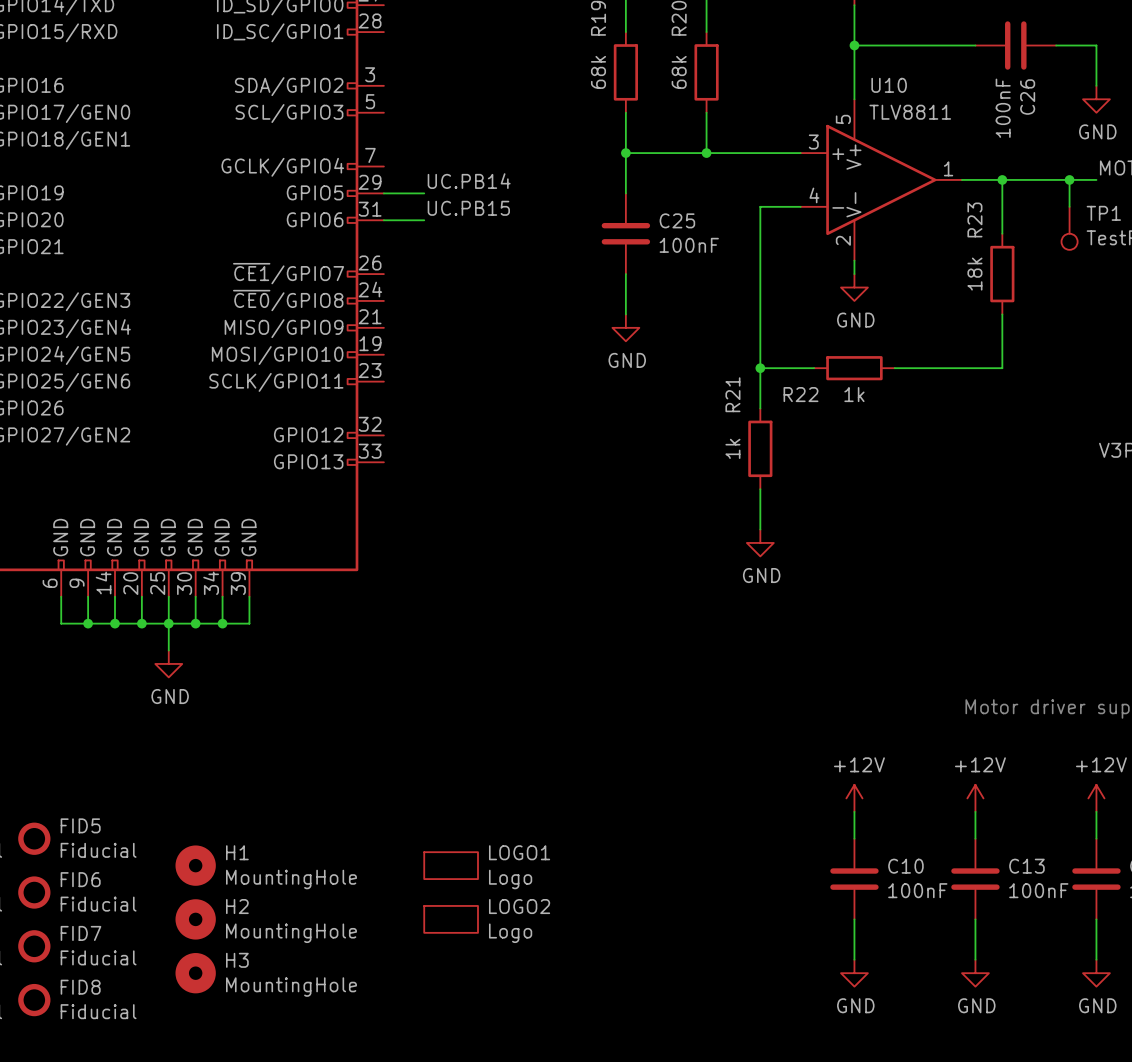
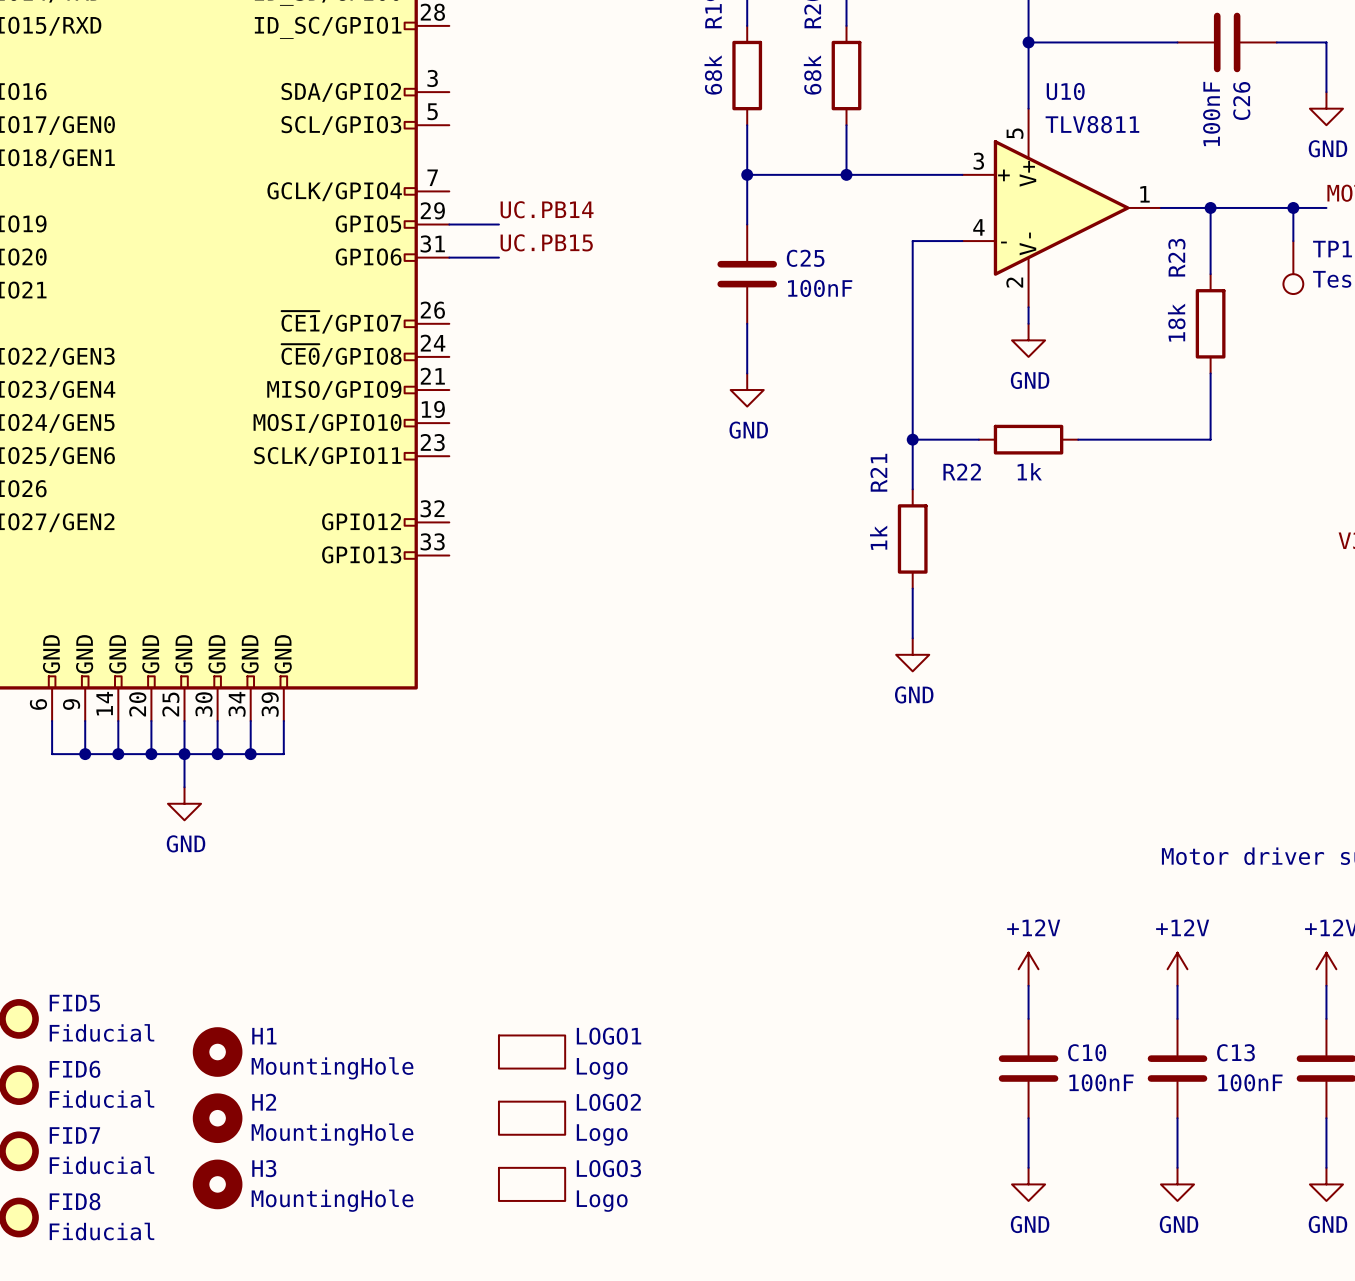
LOGO3: none -> Logo (532, 1184)

